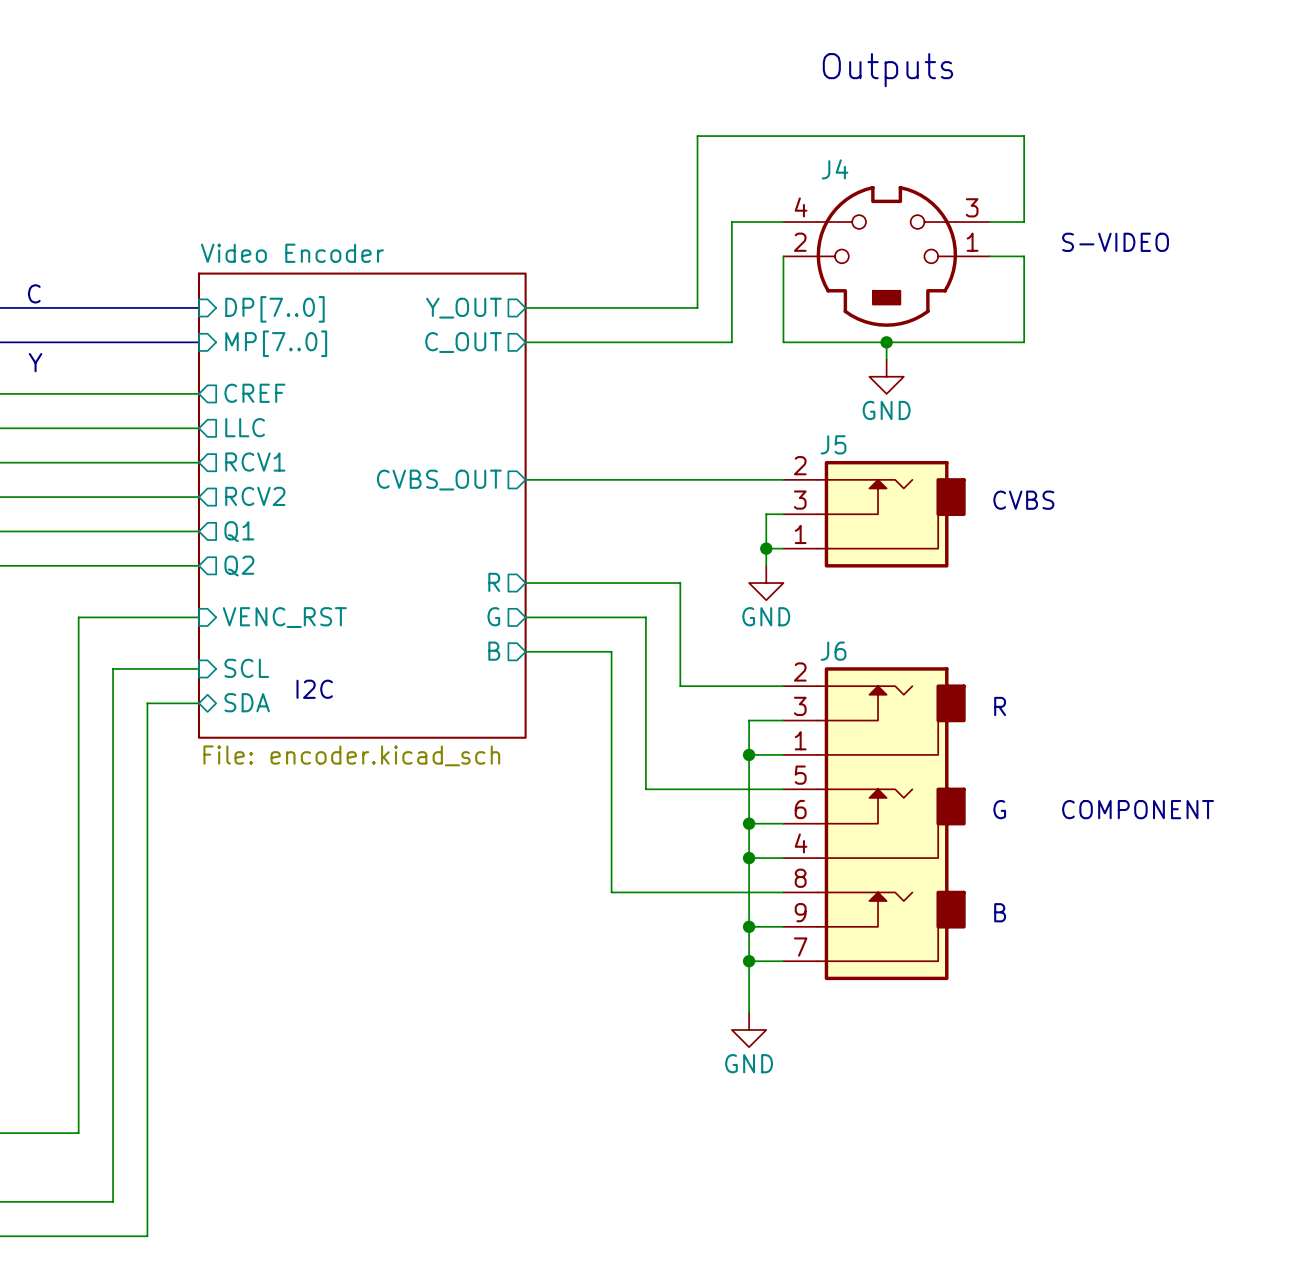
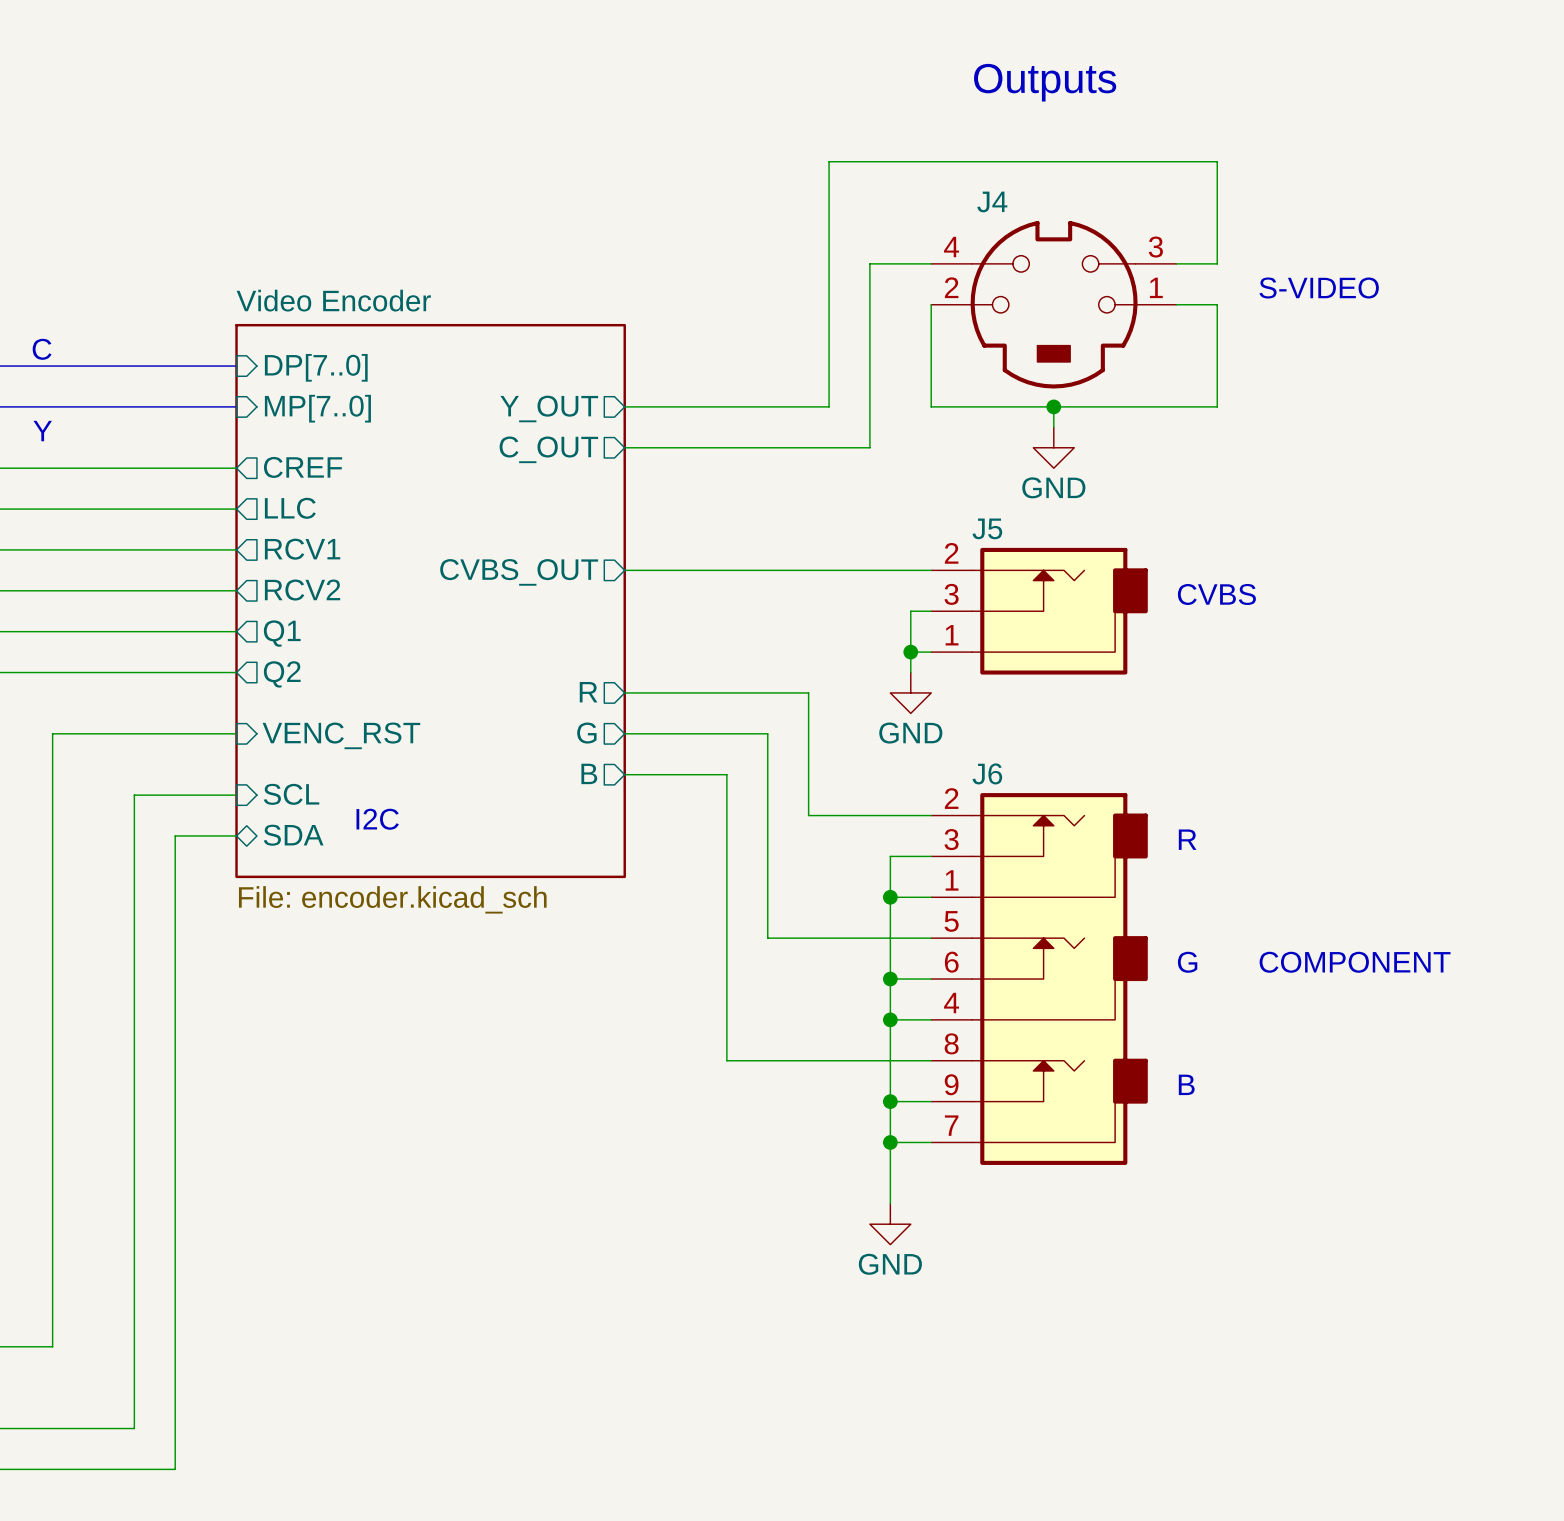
wire: (525, 307) (697, 307) -> none
sheet pin: Y_OUT (463, 308) -> none
sheet pin: C_OUT (463, 342) -> Y_OUT (549, 408)
wire: (697, 342) (731, 342) -> (829, 406) (829, 366)
wire: none -> (869, 406) (869, 447) (624, 447)
sheet pin: none -> C_OUT (548, 449)
wire: (78, 617) (78, 1133) (44, 1133) -> (93, 733) (52, 733) (52, 1346)

